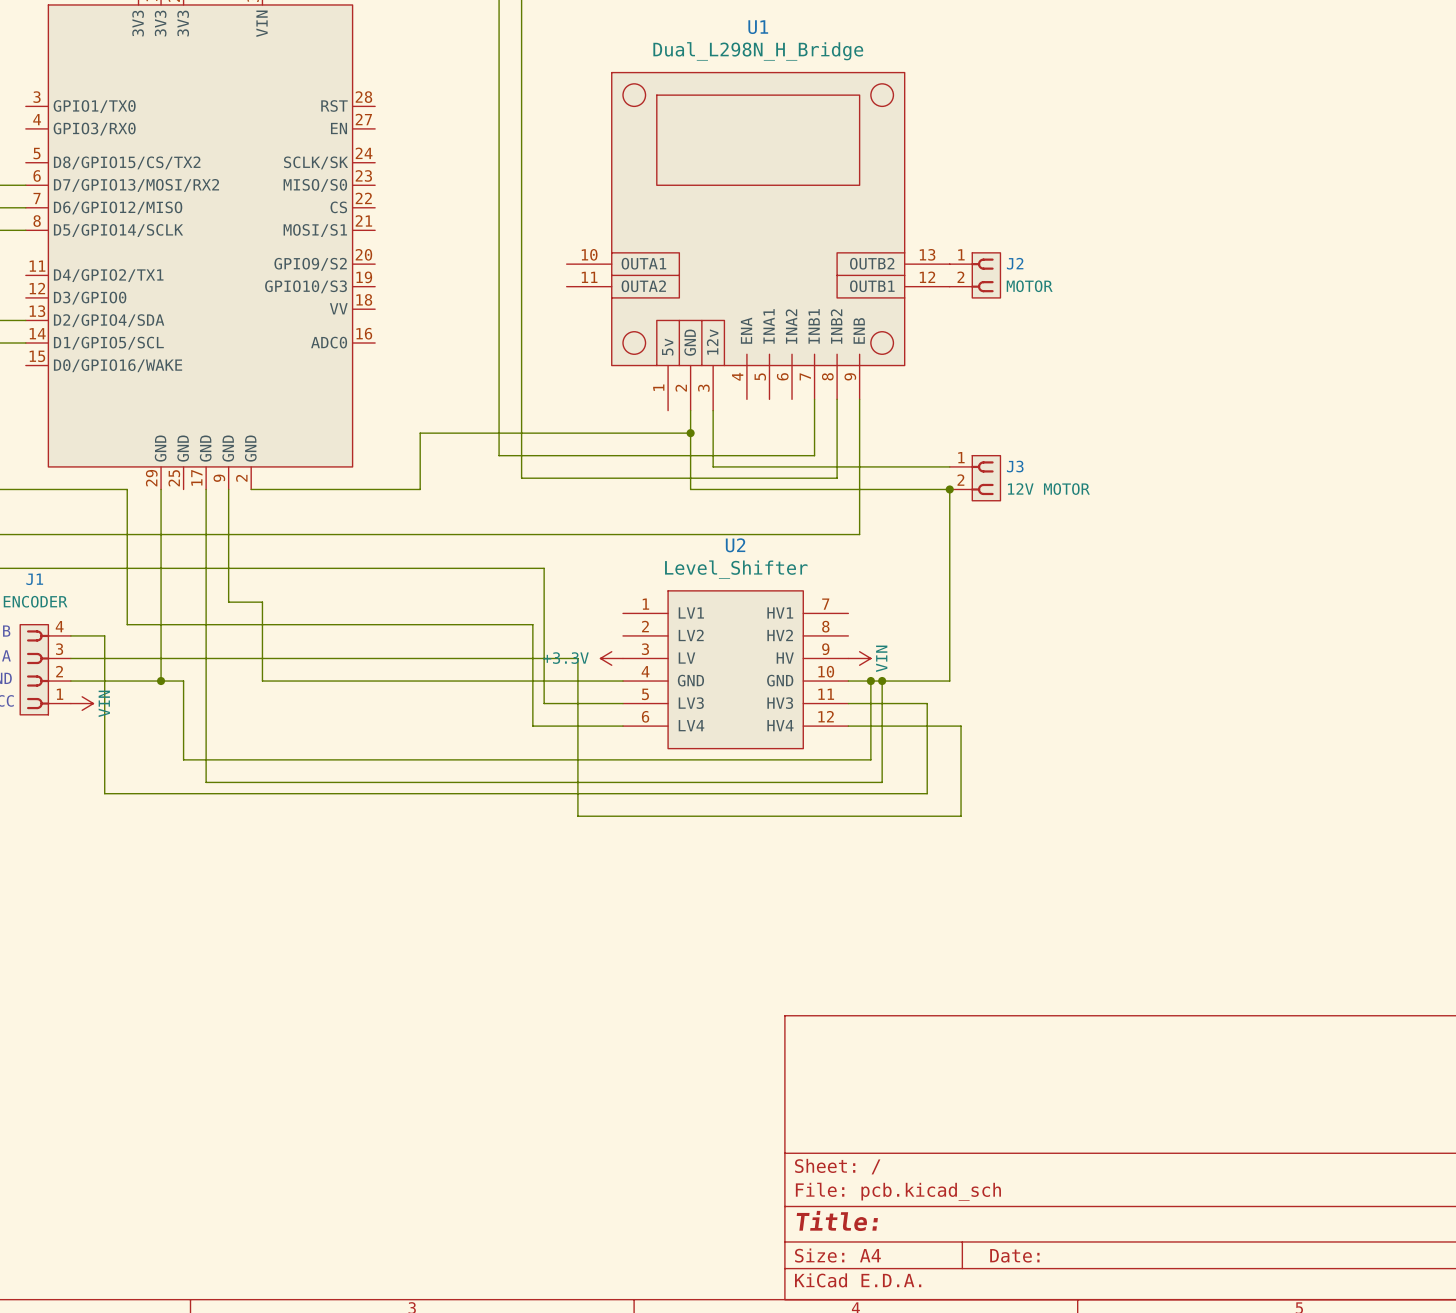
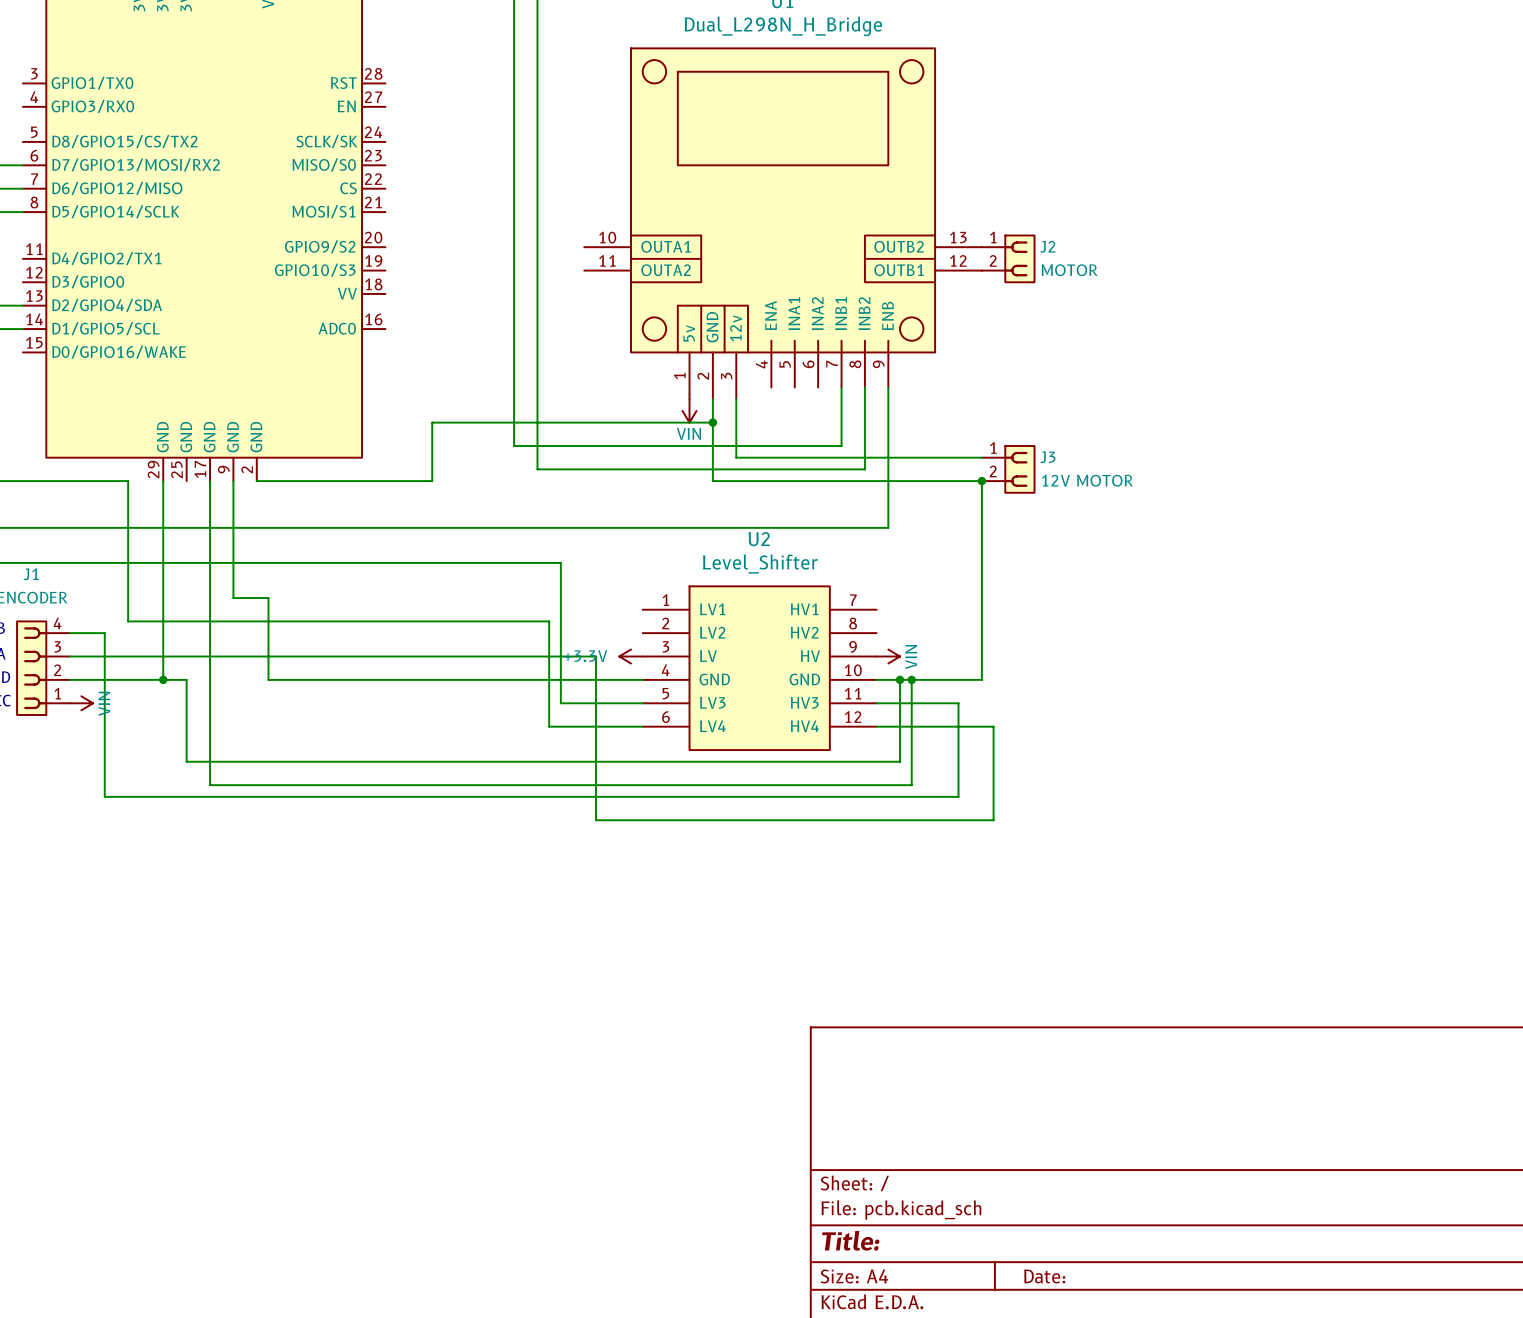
power symbol: none -> VIN (689, 410)

